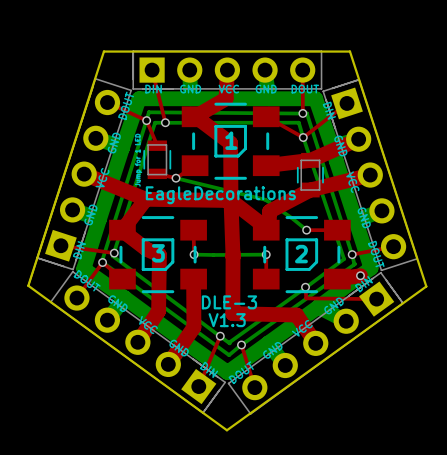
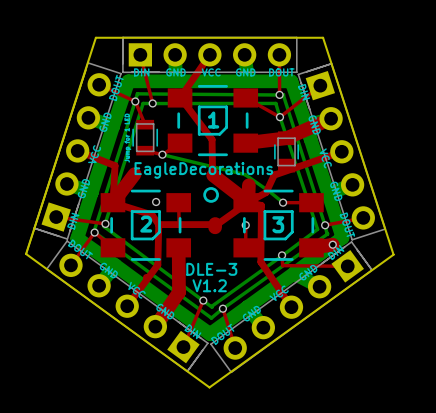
top track: (227, 70) (226, 98) (195, 116) -> (209, 54) (180, 97)
top track: (195, 116) (230, 143) (230, 200) -> (180, 97) (212, 139) (212, 169) (248, 202)
top track: (84, 174) (145, 199) (230, 200) -> (77, 150) (115, 165) (113, 202)
top track: (370, 175) (310, 190) (269, 210) -> (341, 151) (274, 175) (266, 192) (248, 202)
top track: (230, 200) (232, 313) (296, 315) (315, 343) -> (248, 202) (261, 205) (260, 262) (291, 307)
drawing: none -> [203, 187, 219, 203]
top track: (121, 229) (146, 249) (159, 255) (158, 311) (137, 342) -> (158, 224) (157, 264) (127, 306)
top track: none -> (111, 202) (152, 214) (158, 224)
top track: none -> (248, 202) (217, 224) (158, 224)
text: 3 (158, 253) -> 2 (146, 224)
bottom track: (194, 254) (266, 254) -> none
via position: (194, 254) -> (156, 202)
text: 2 (301, 254) -> 3 (278, 224)
text: V1.3 (227, 320) -> V1.2 (209, 285)

